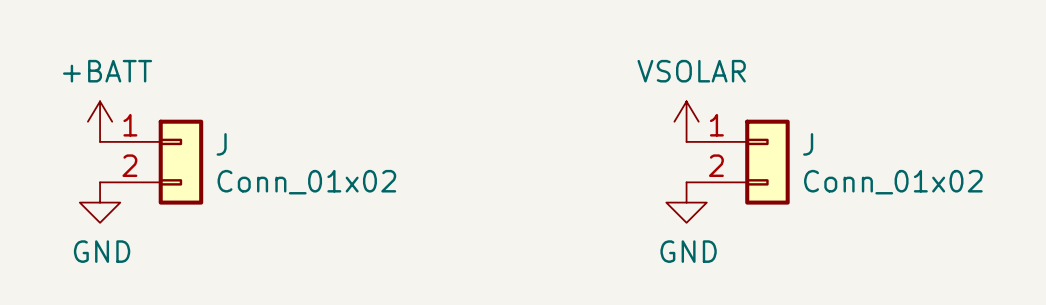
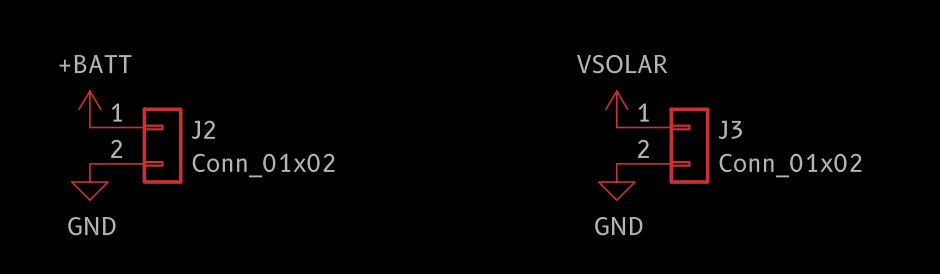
J name: J (221, 144) -> J2 (203, 129)
J name: J (808, 144) -> J3 (730, 129)

